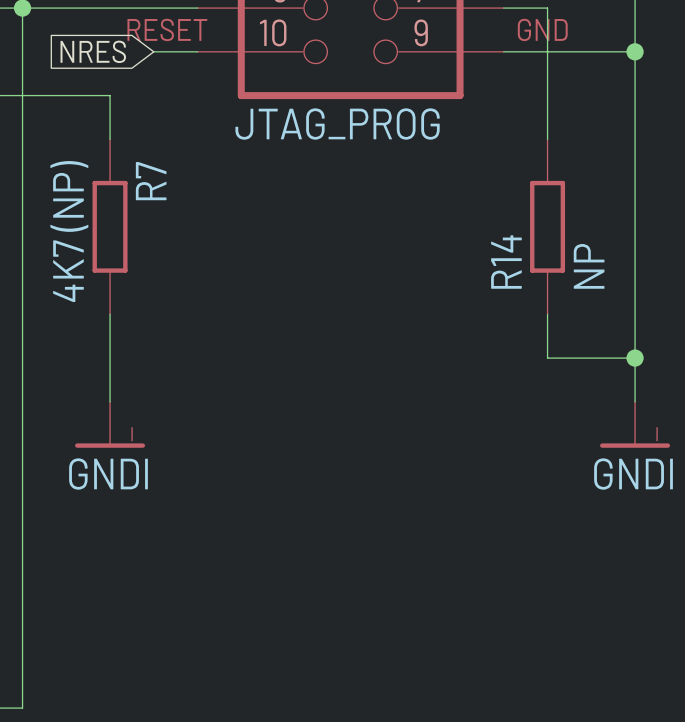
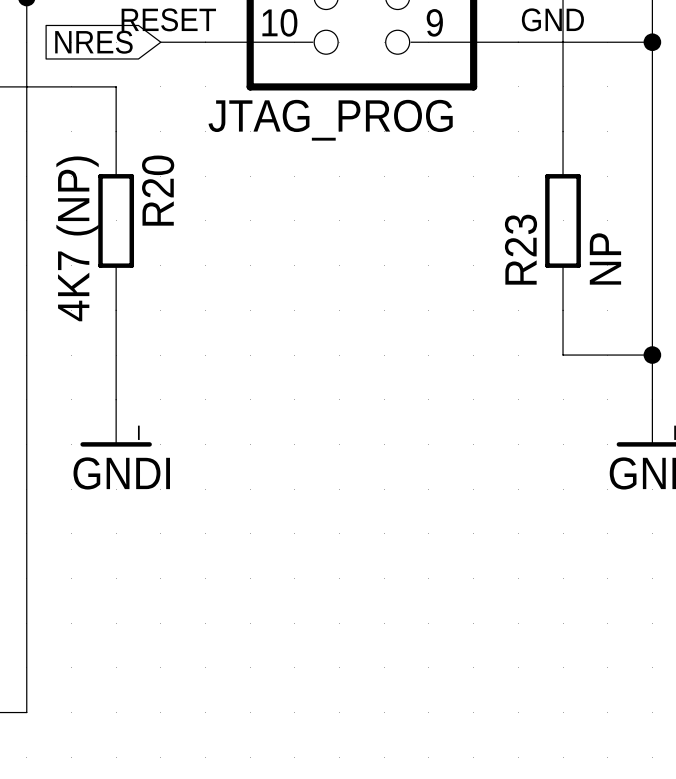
R7 name: R7 (151, 181) -> R20 (158, 190)
R14 name: R14 (506, 262) -> R23 (520, 249)

